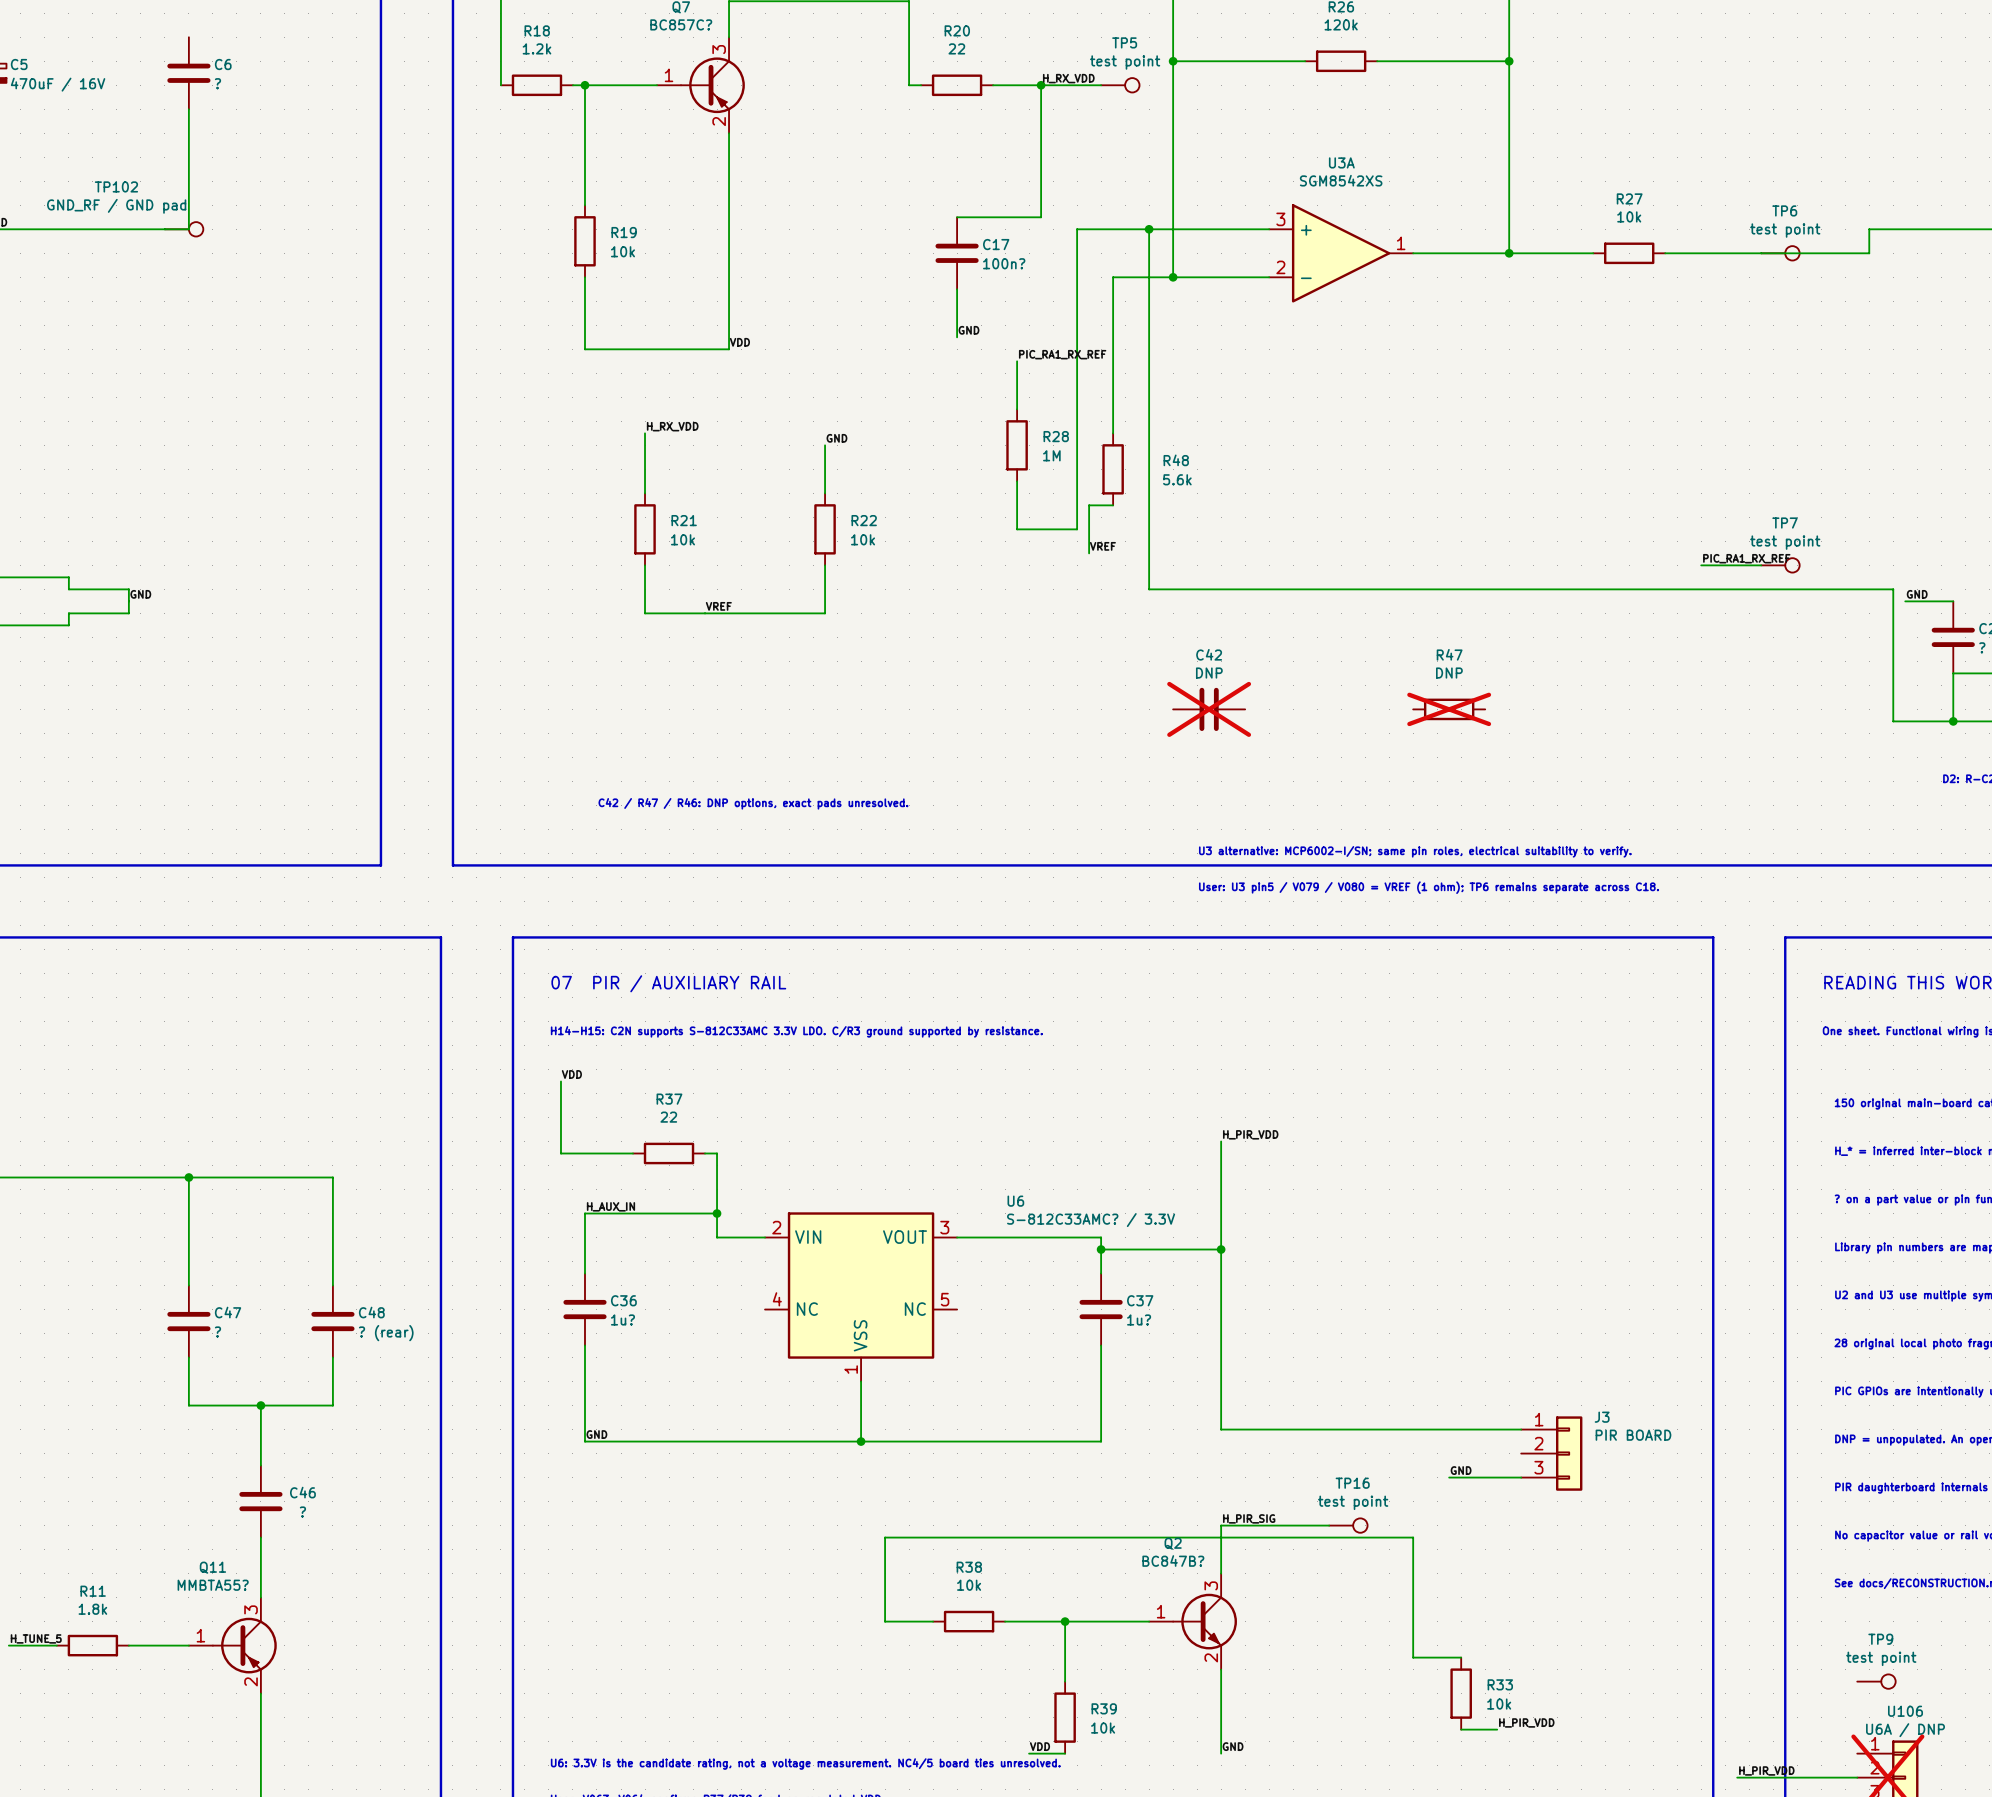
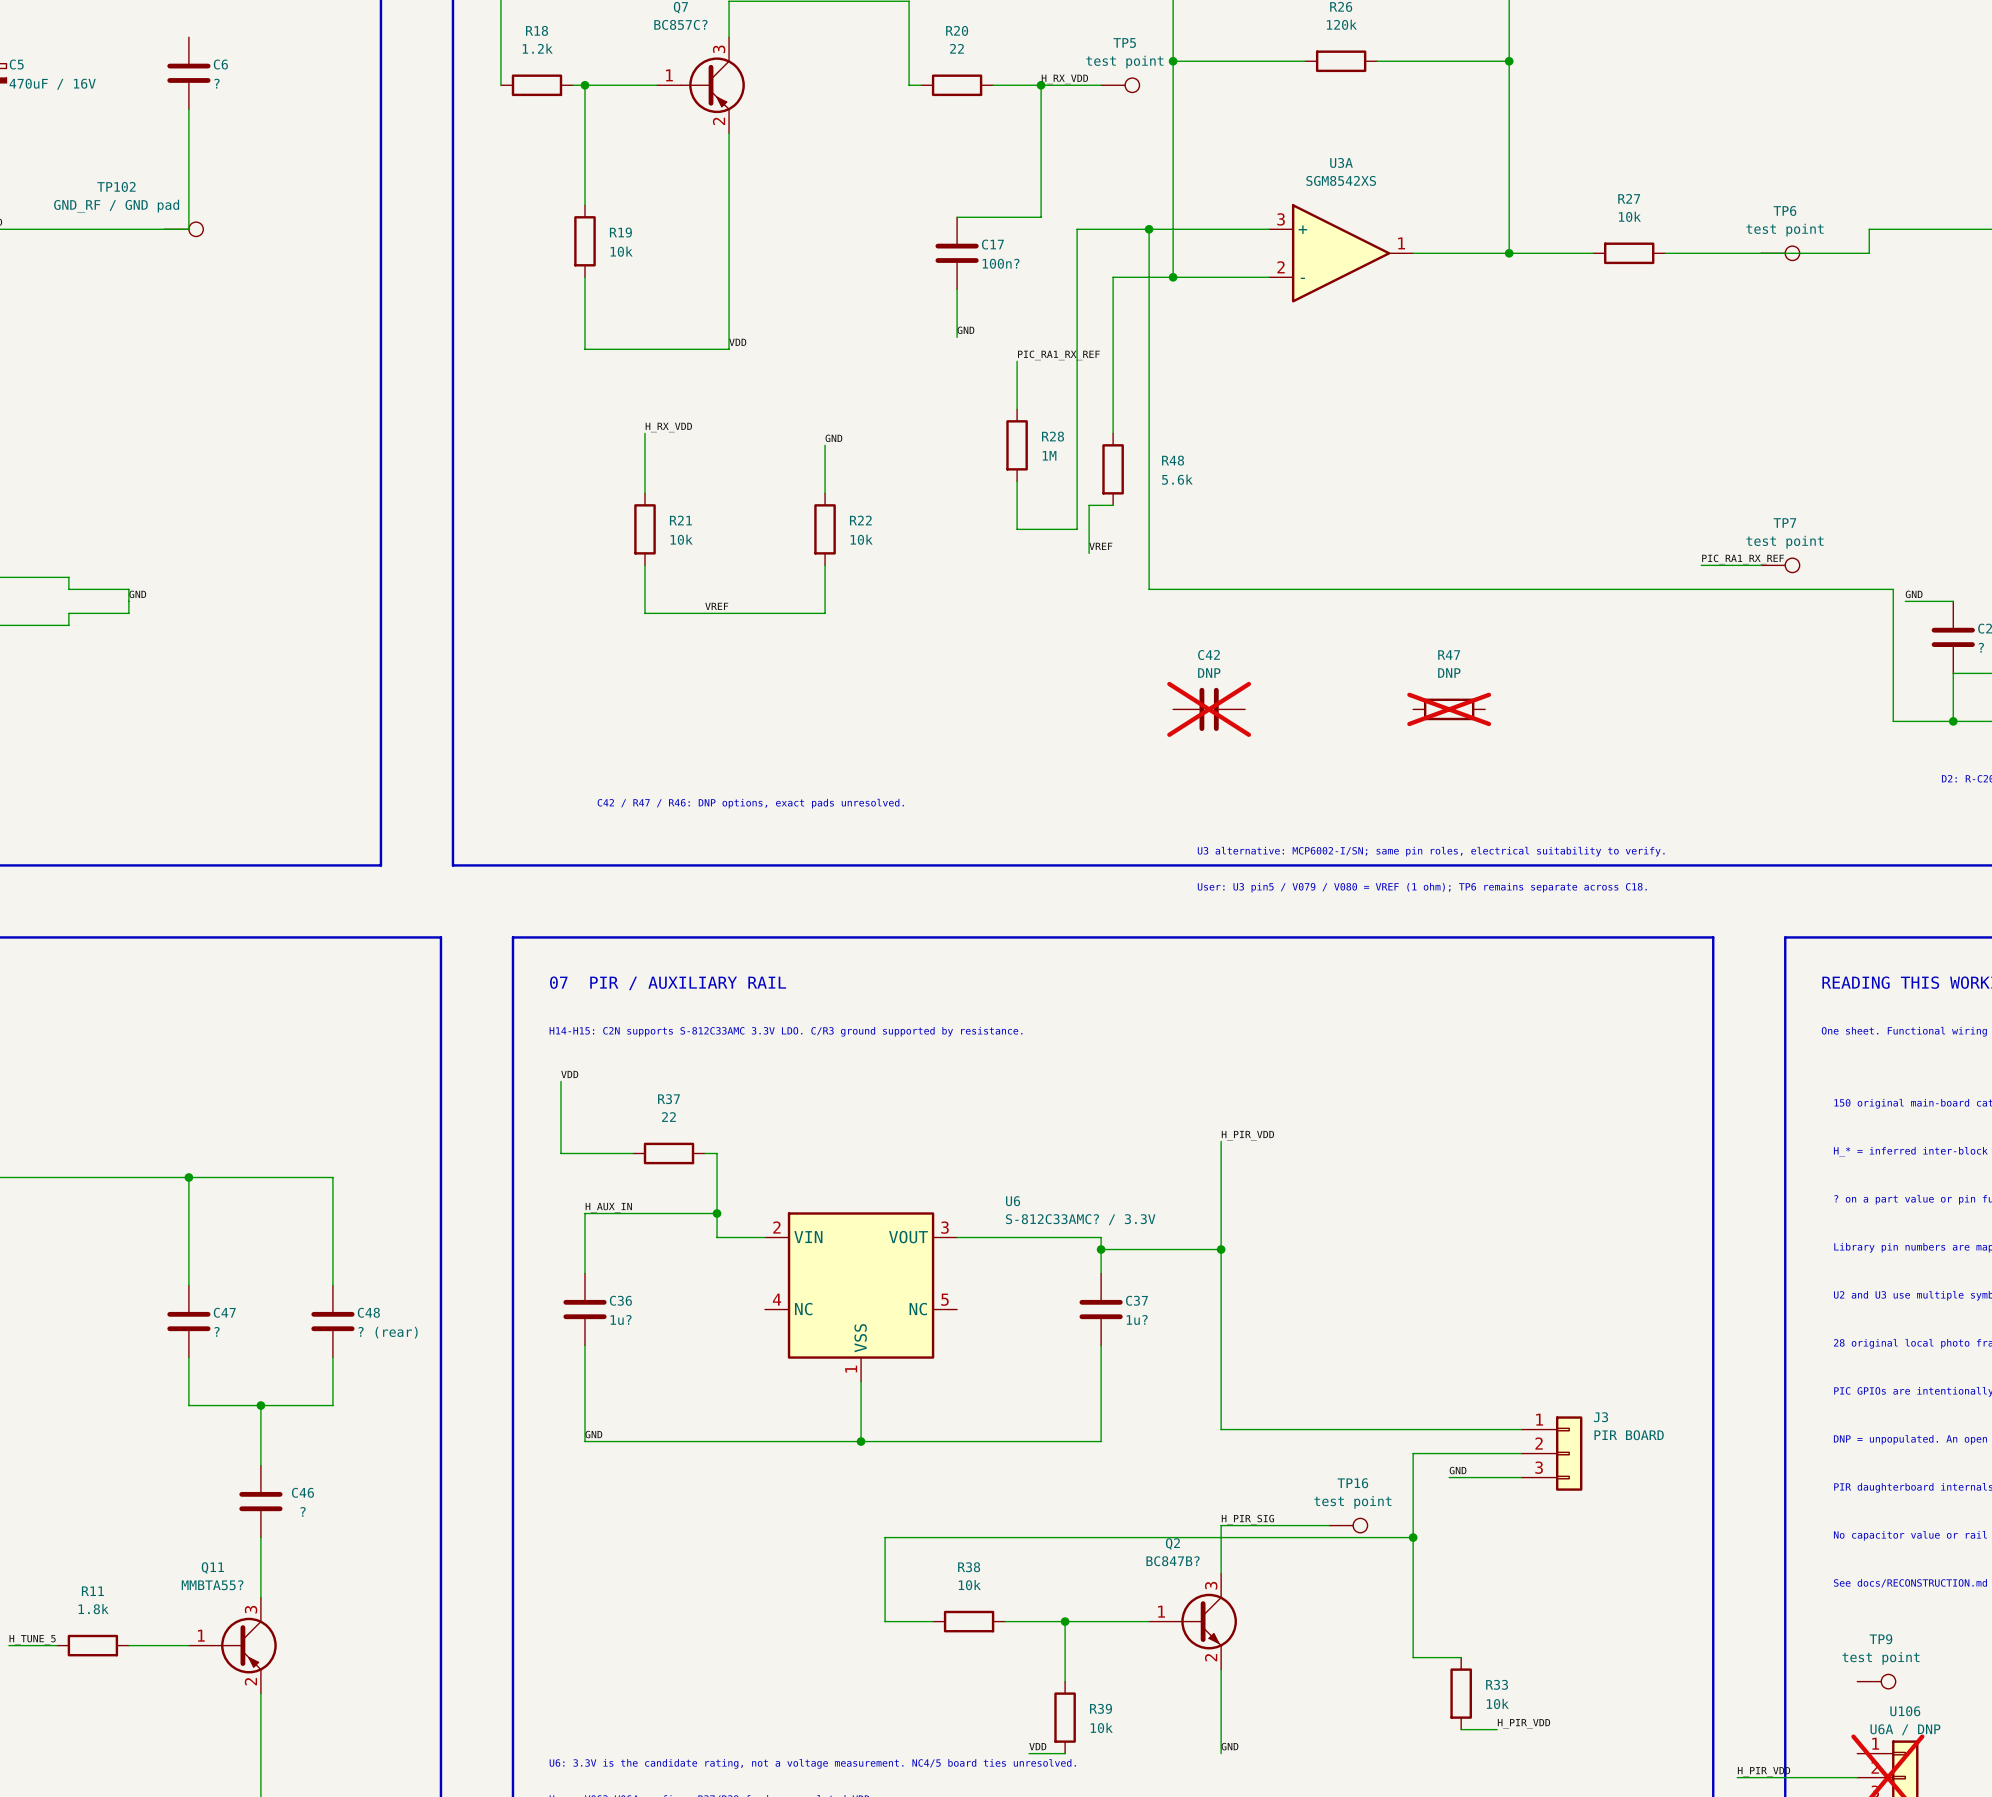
wire: none -> (1521, 1453) (1413, 1453) (1413, 1537)
junction: none -> (1413, 1537)

